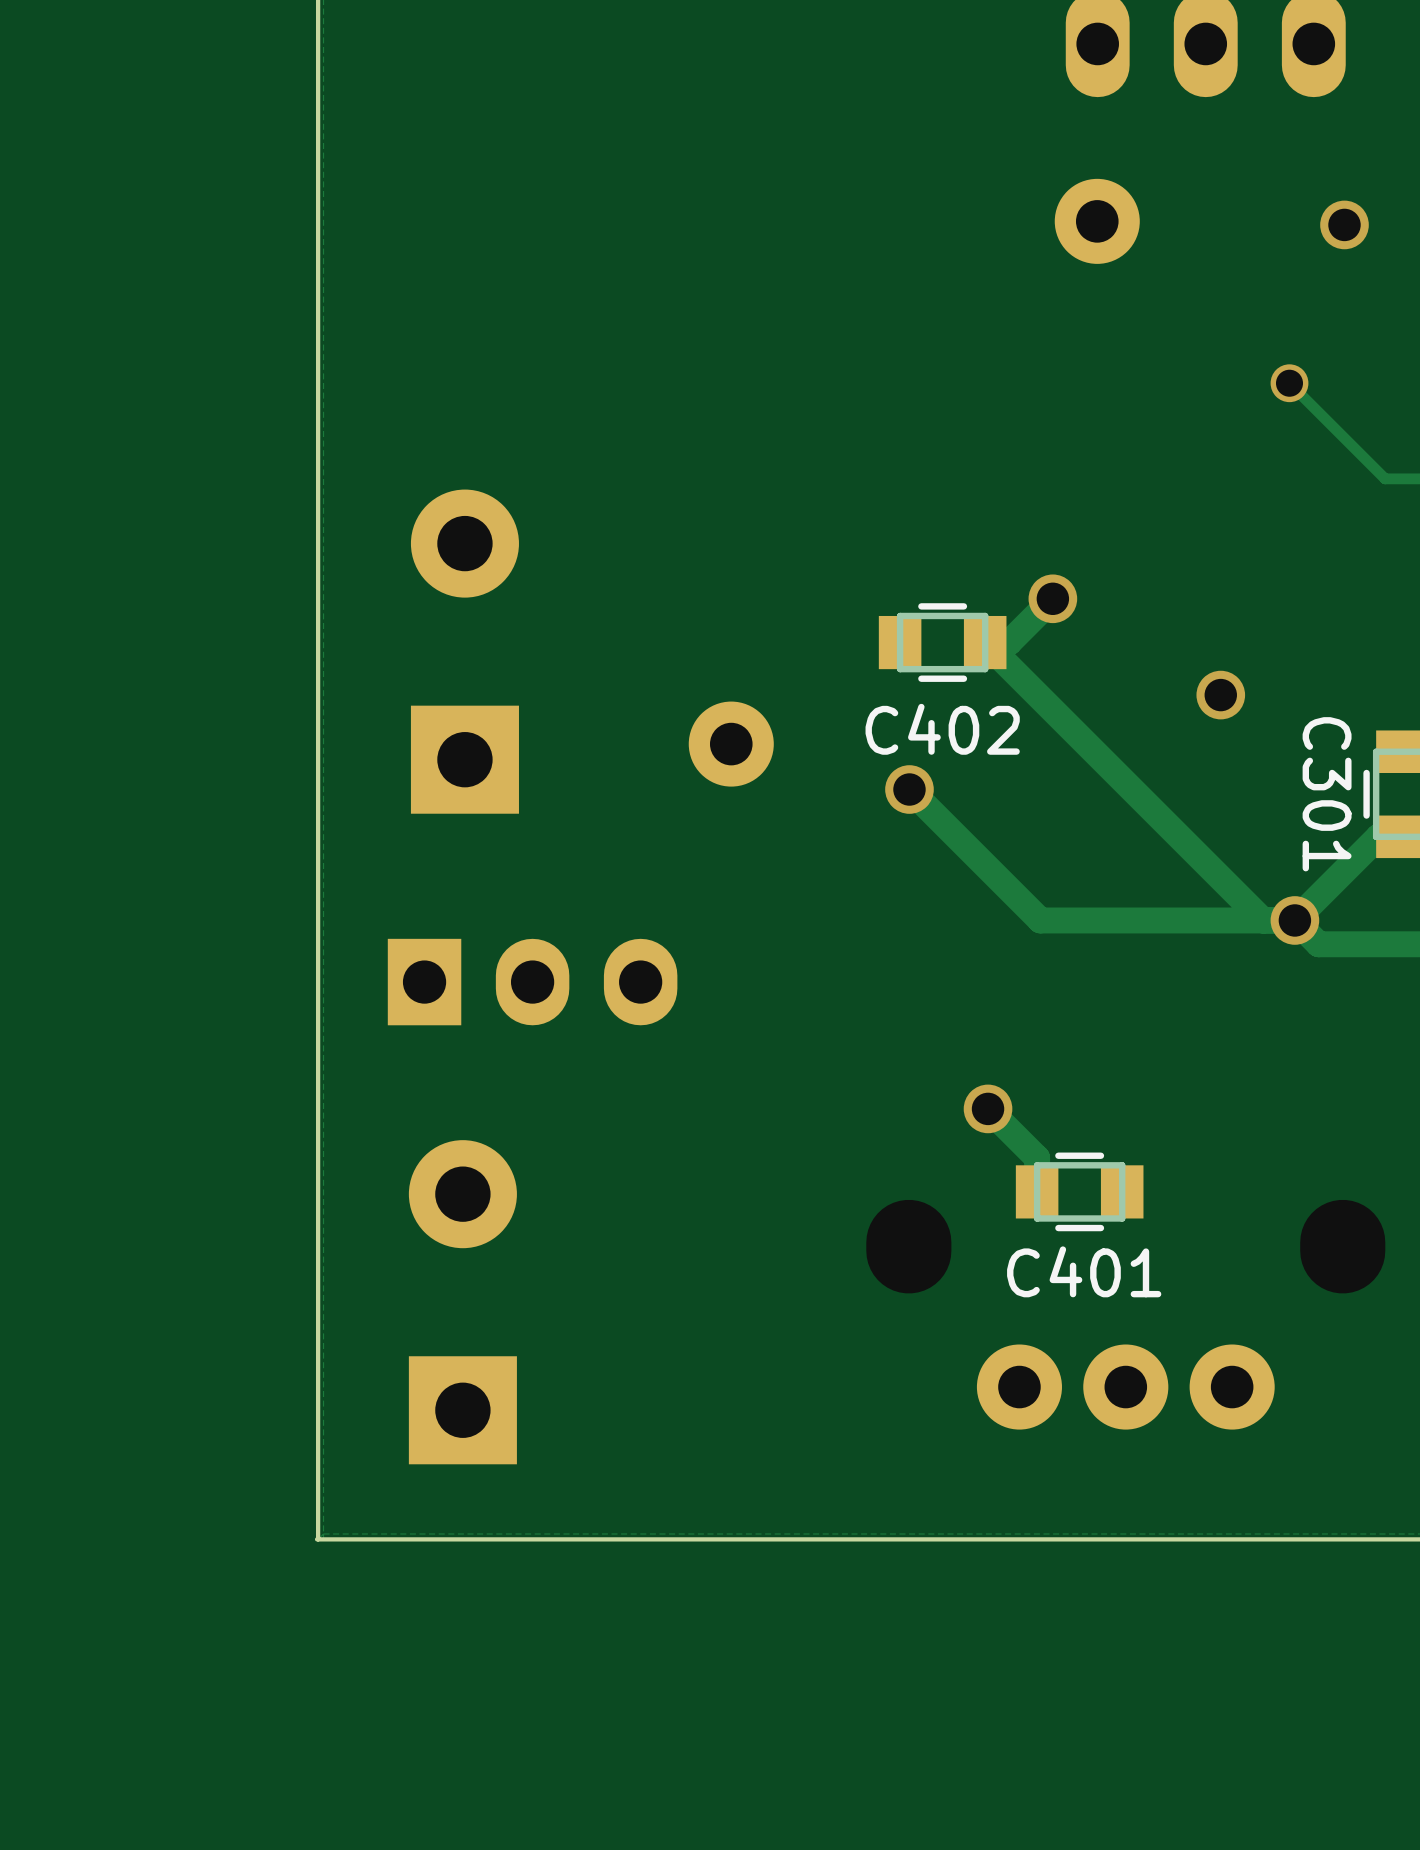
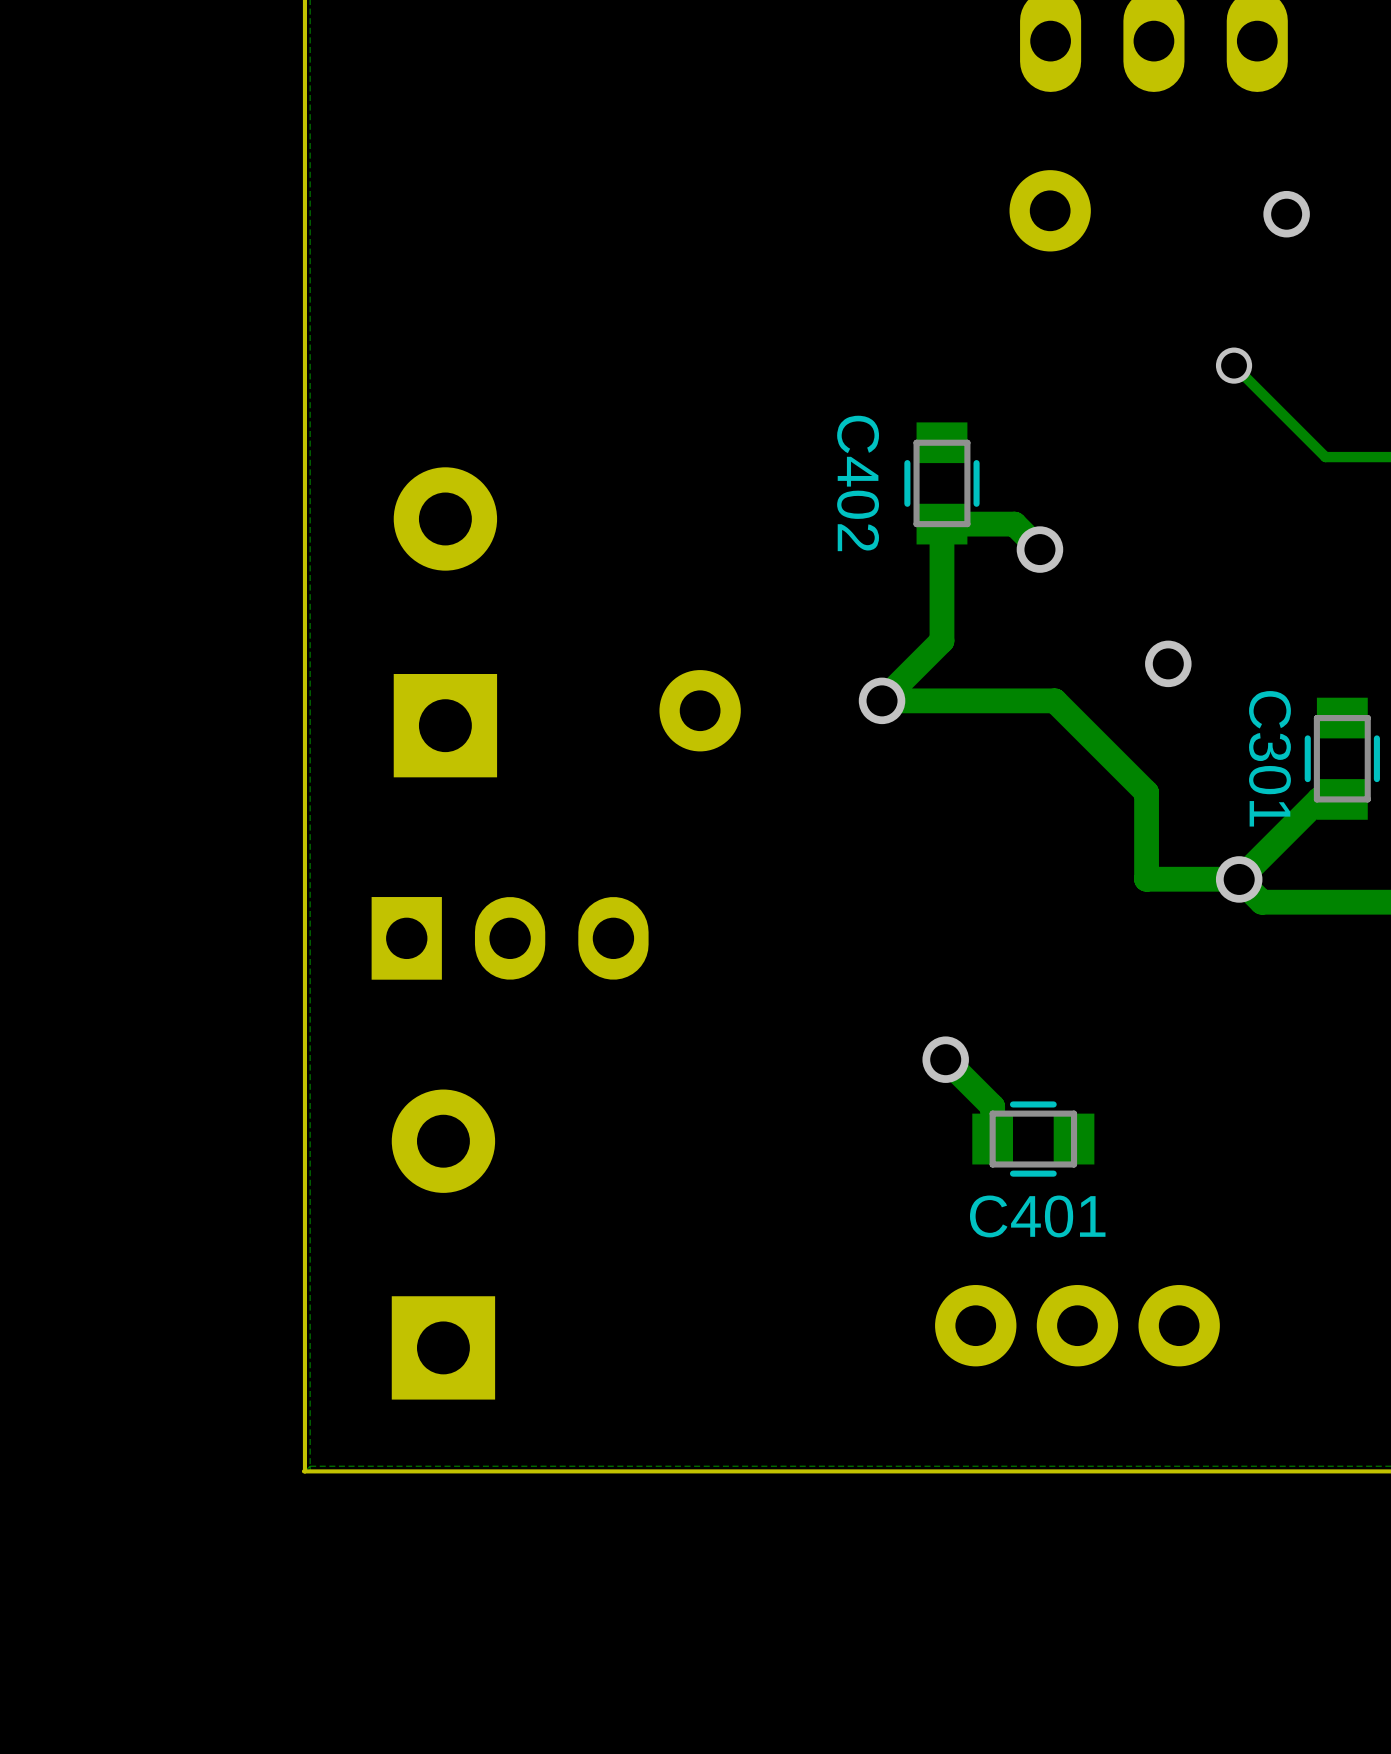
track: (1052, 598) (1009, 642) (985, 642) (1263, 920) -> none
via position: (1052, 598) -> (1039, 549)
C402 rotation: 0° (942, 642) -> 90° clockwise (941, 483)
C402 position: (942, 642) -> (941, 483)
track: (909, 789) (1040, 920) (1294, 920) -> (1039, 549) (1014, 524) (941, 524) (941, 640) (882, 700) (1054, 700) (1146, 792) (1146, 879) (1238, 879)
via position: (909, 789) -> (882, 700)

